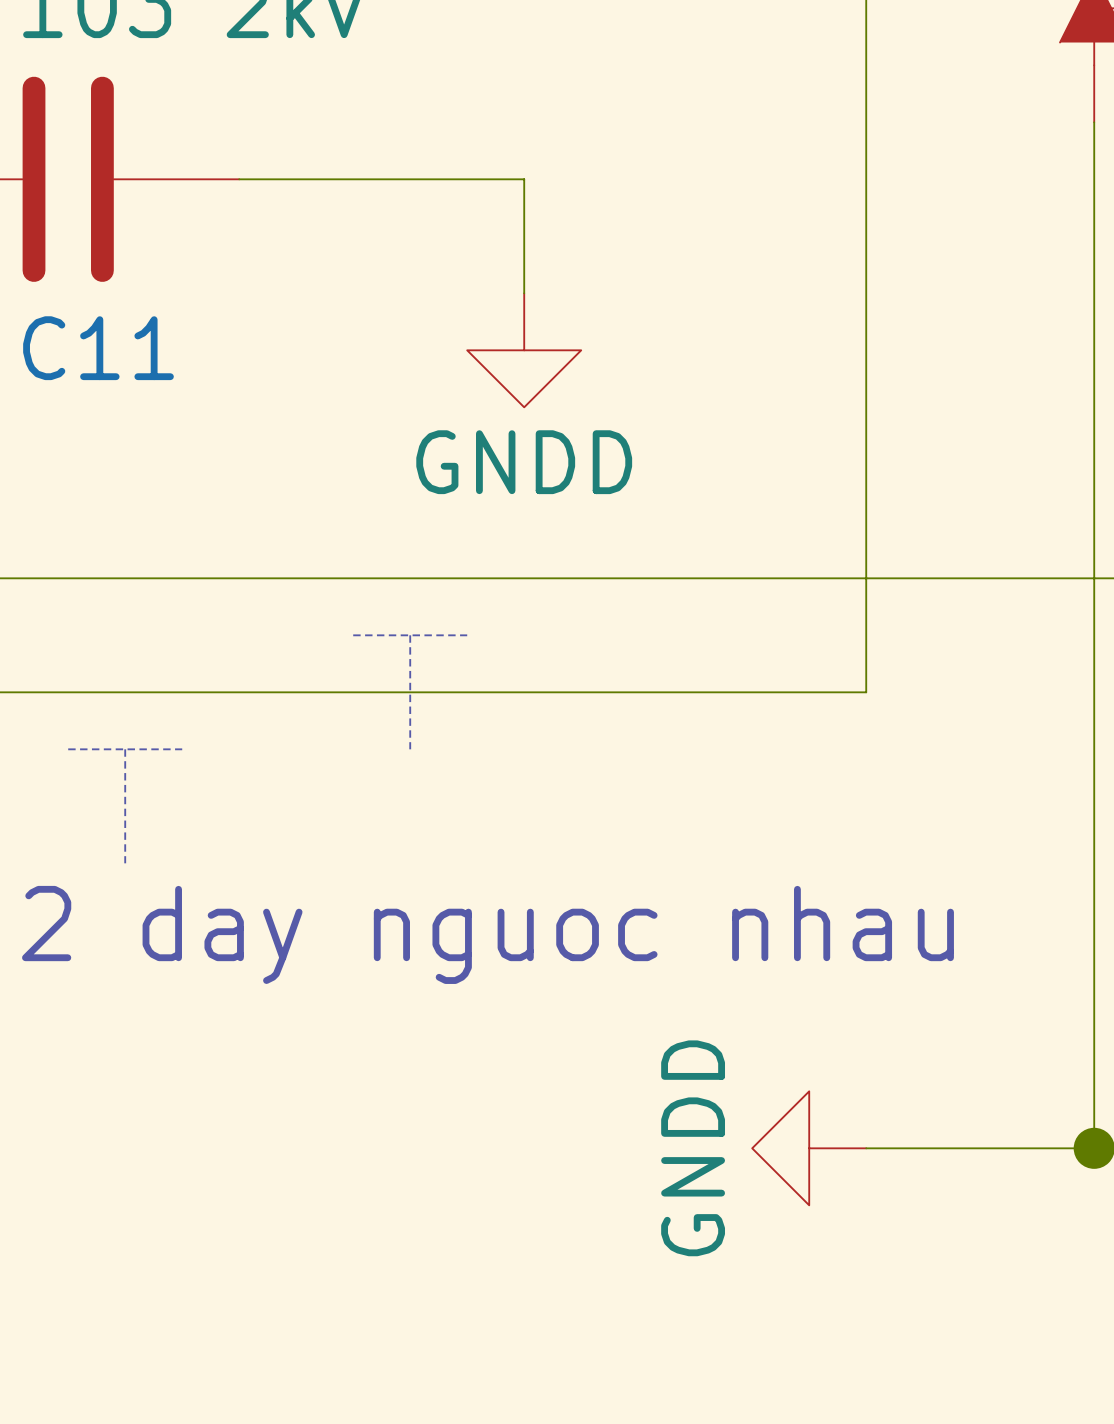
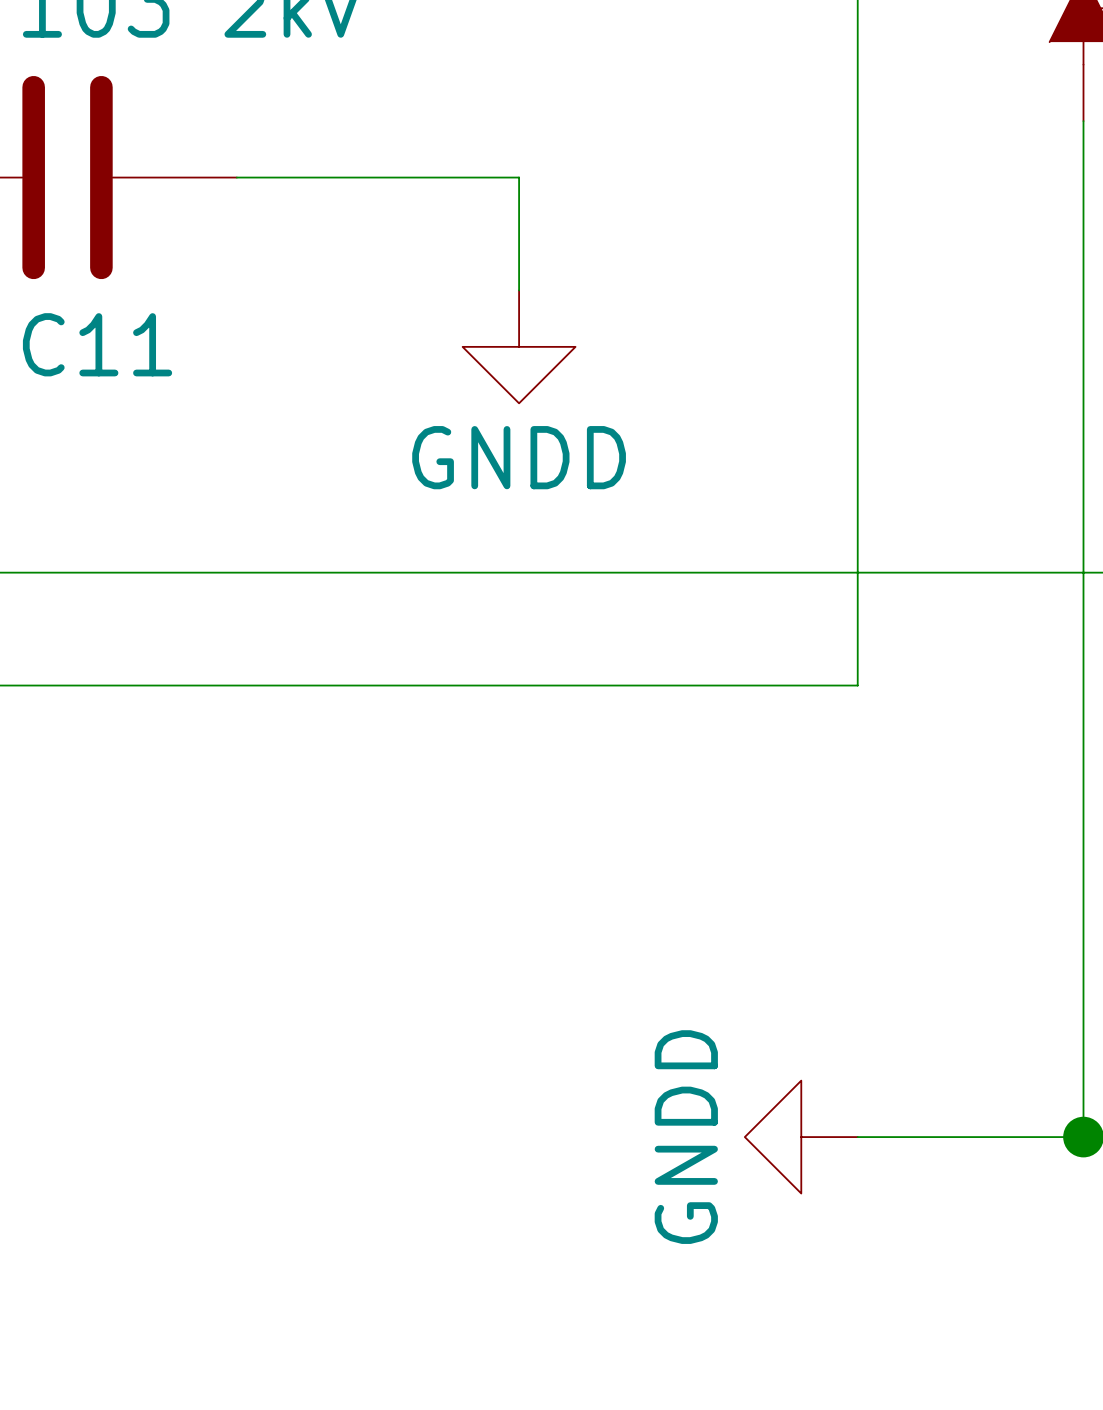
line: (353, 635) (467, 635) -> none
line: (410, 635) (410, 749) -> none
line: (68, 749) (182, 749) -> none
line: (125, 749) (125, 863) -> none
text: 2 day nguoc nhau (488, 934) -> none

